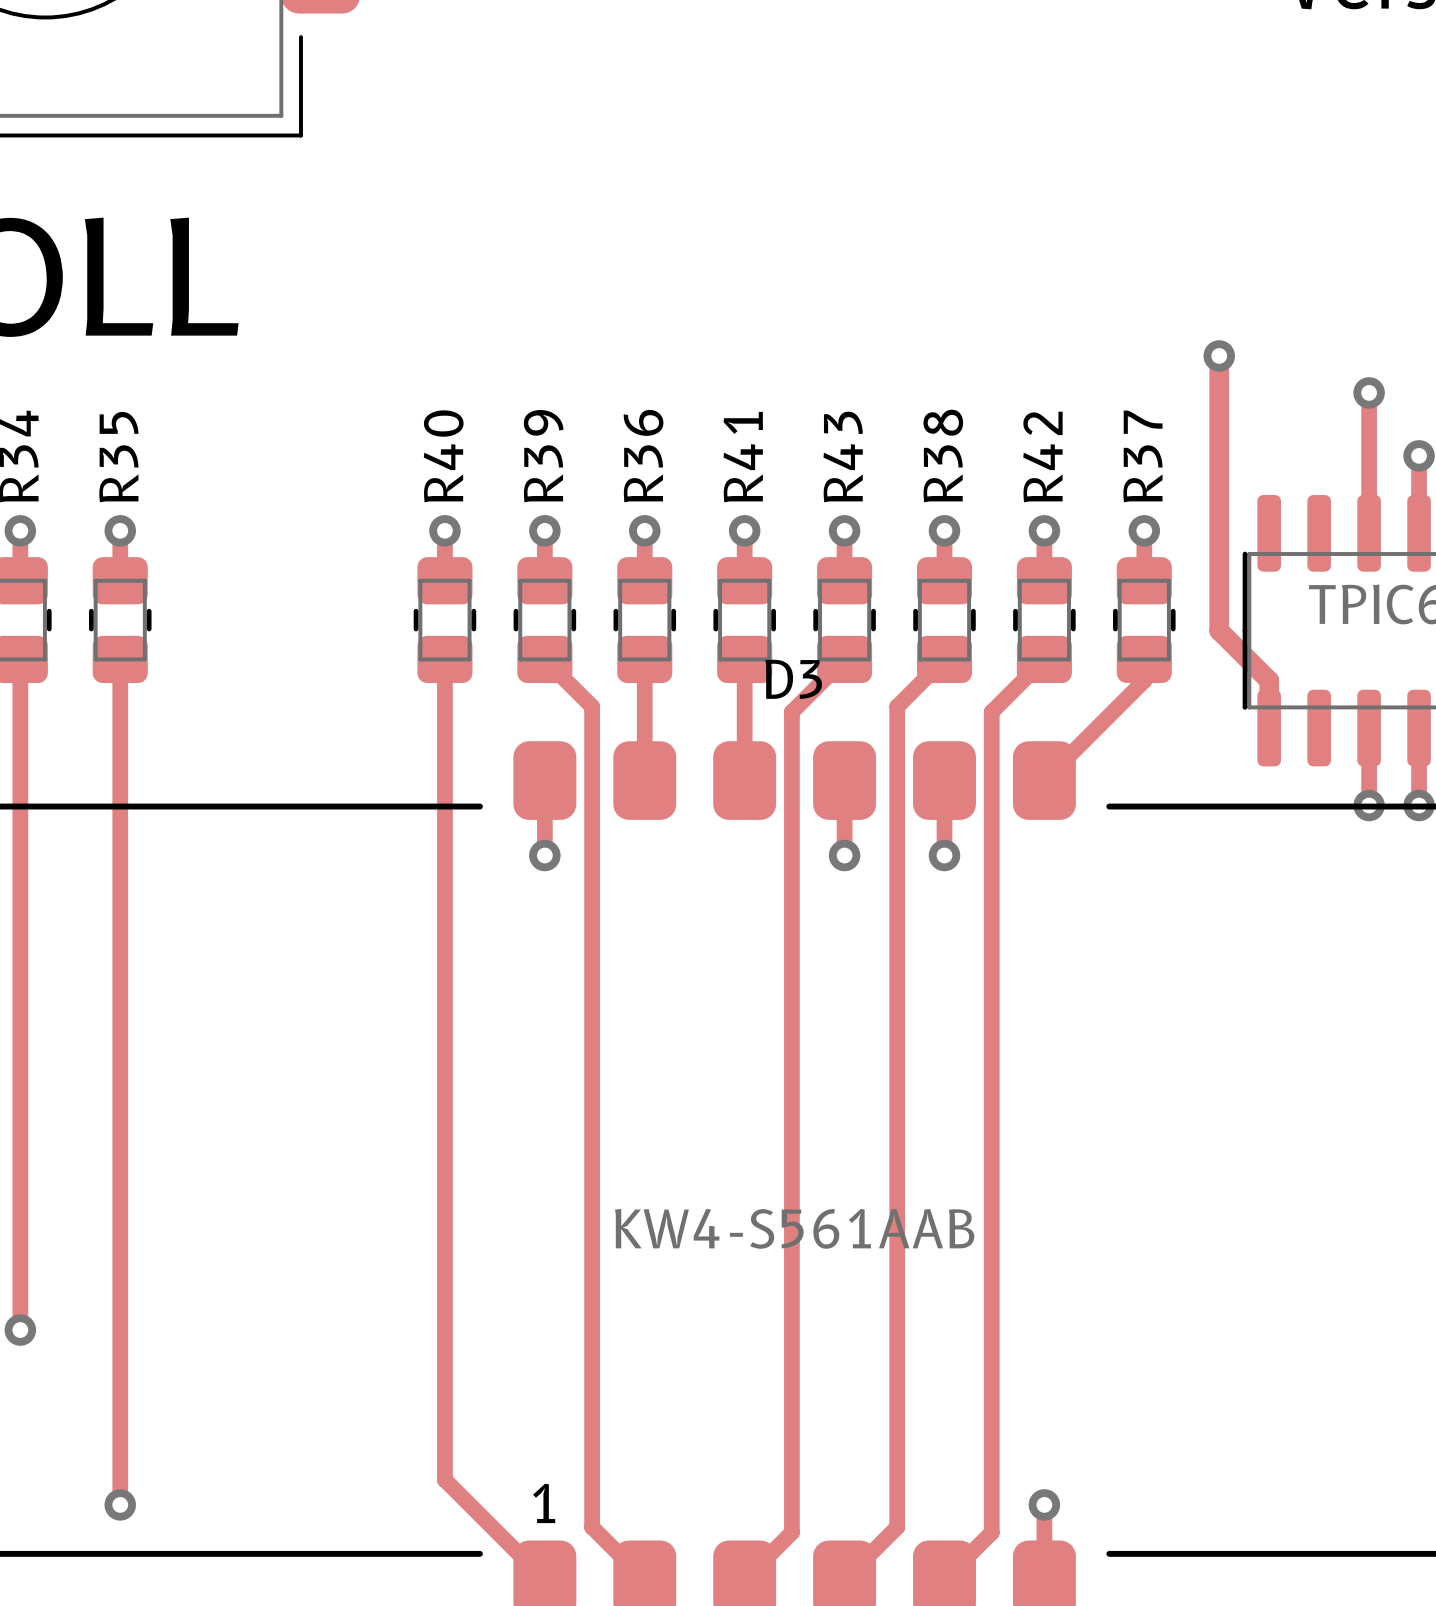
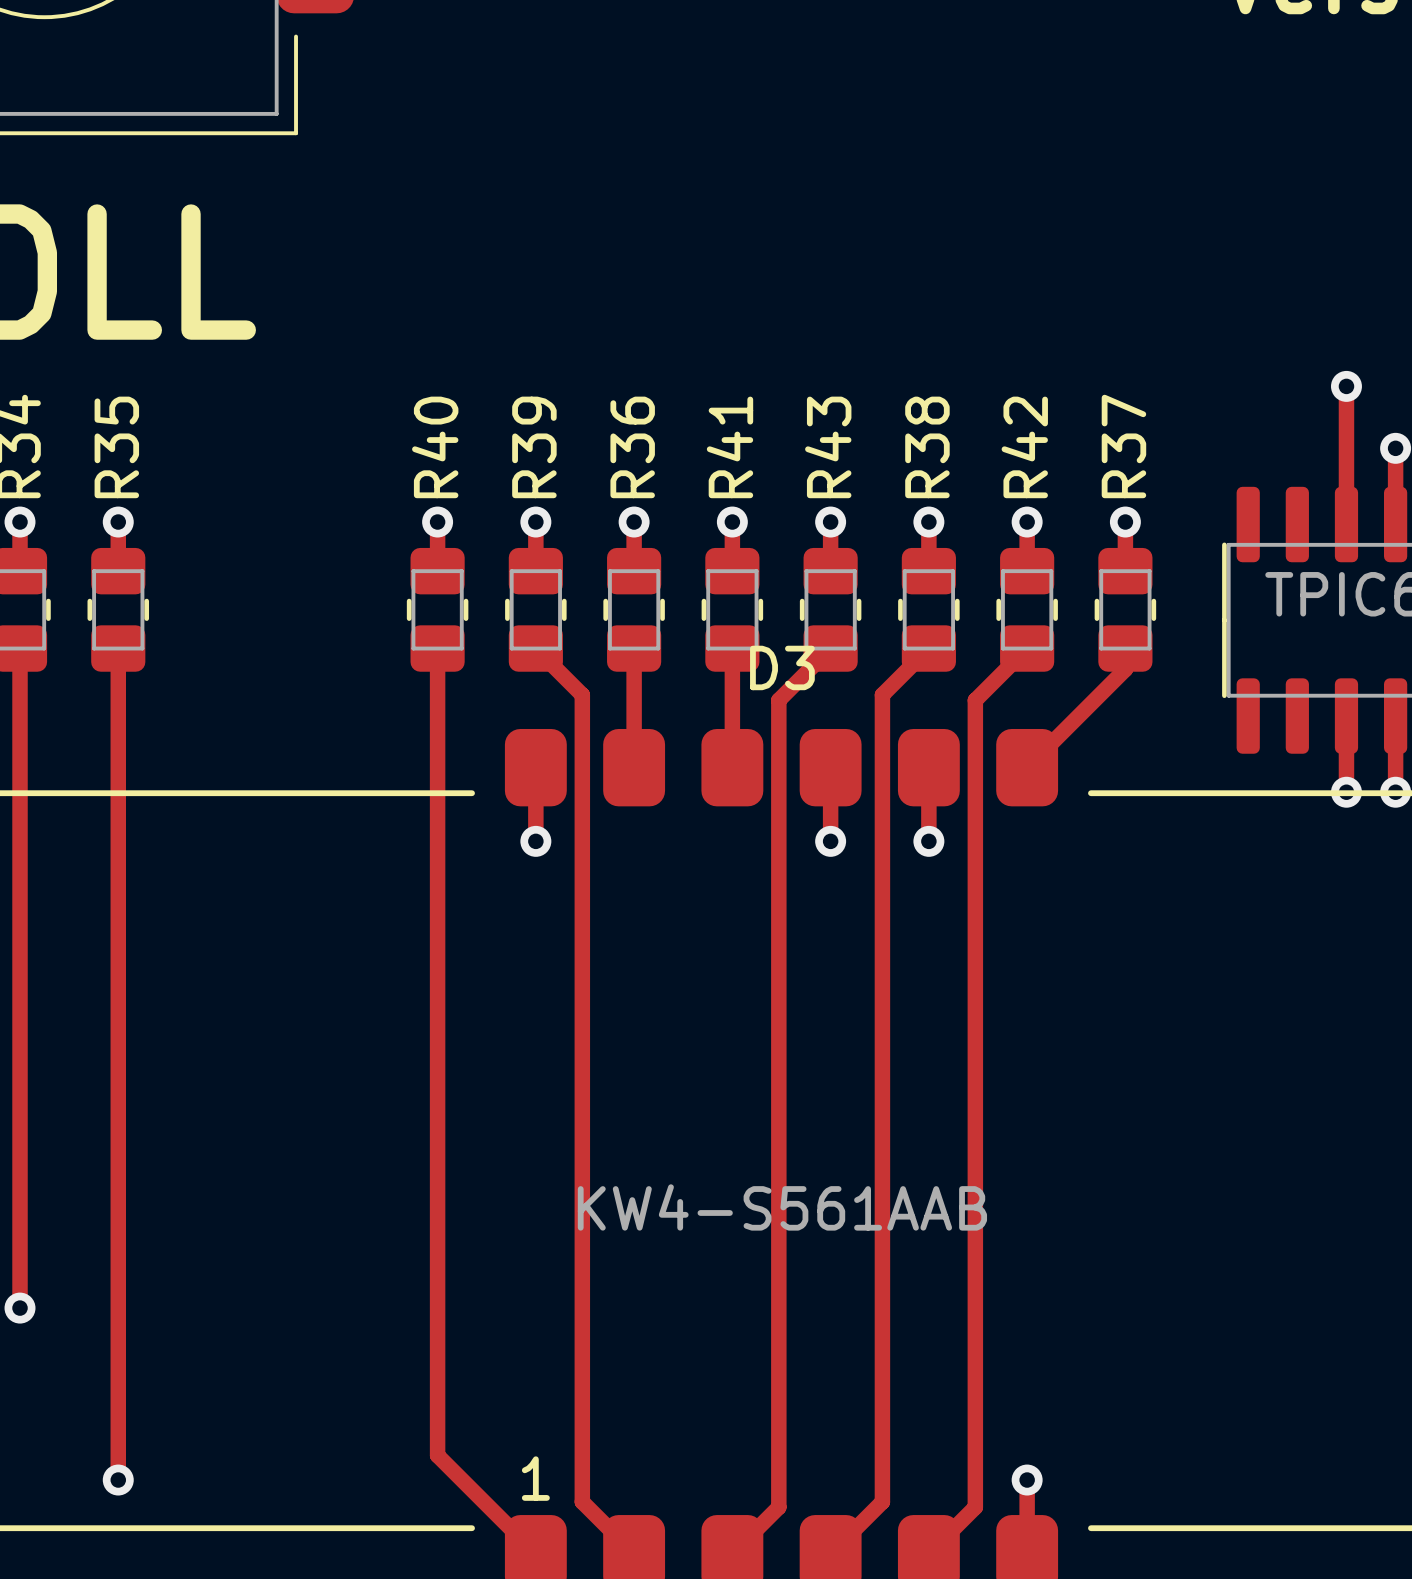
track: (1219, 355) (1219, 630) (1269, 680) (1269, 728) -> none
via: (1219, 355) -> none

